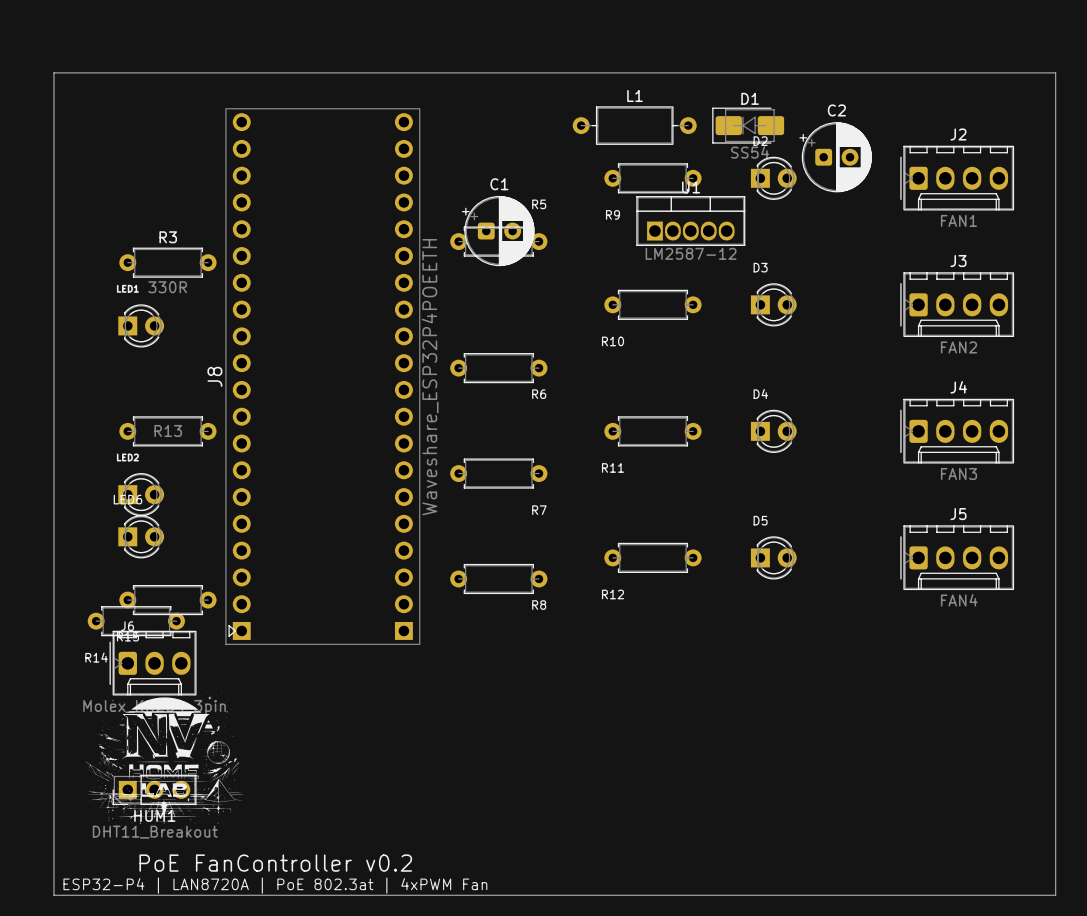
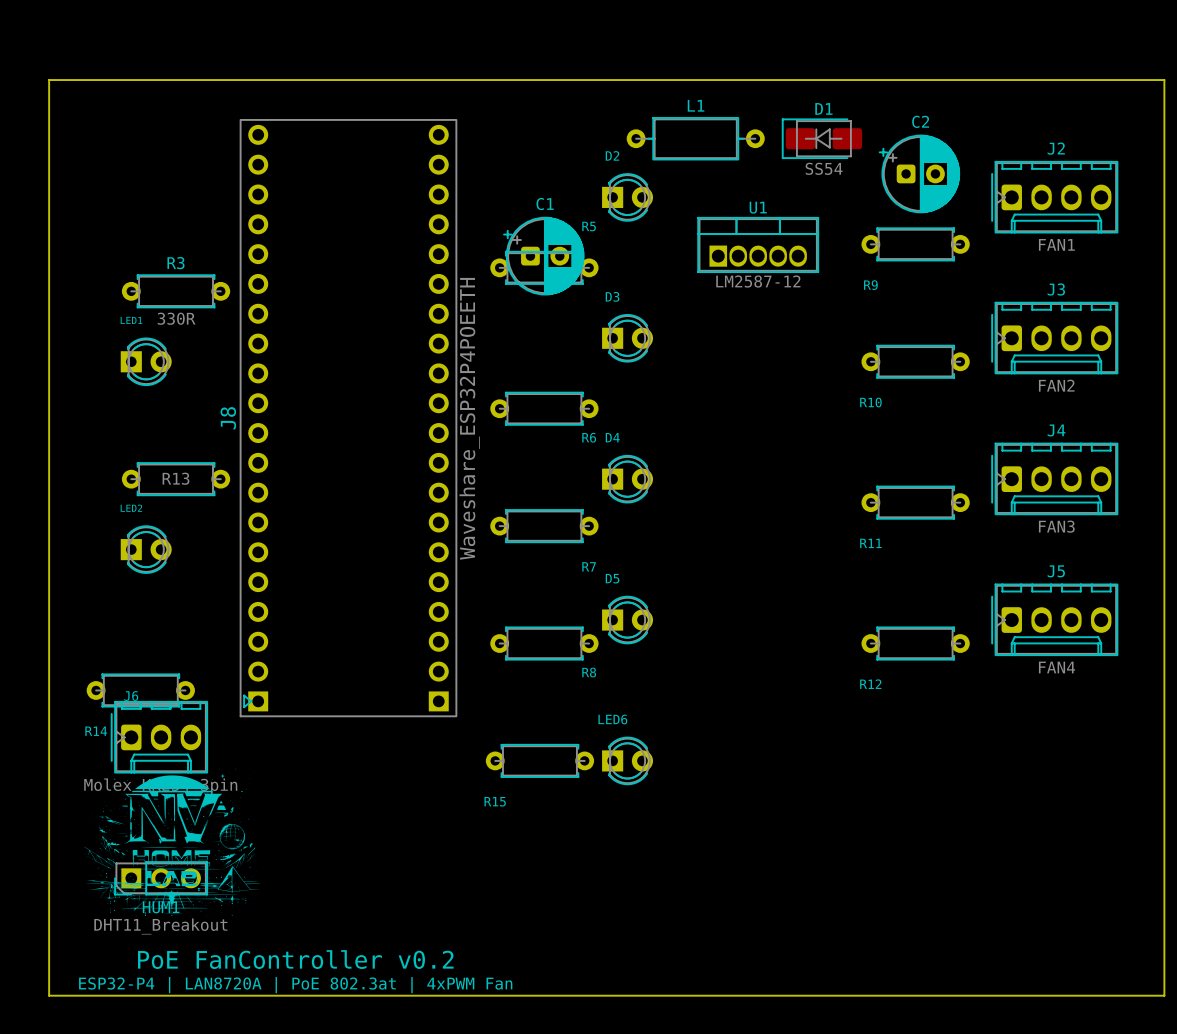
R9 position: (652, 178) -> (915, 244)
D2 position: (773, 178) -> (627, 197)
R10 position: (652, 304) -> (915, 361)
D3 position: (773, 304) -> (627, 338)
R11 position: (652, 431) -> (915, 502)
D4 position: (773, 431) -> (627, 479)
LED6 position: (141, 536) -> (627, 760)
R12 position: (652, 557) -> (915, 643)
D5 position: (773, 557) -> (627, 620)
R15 position: (167, 600) -> (539, 760)

